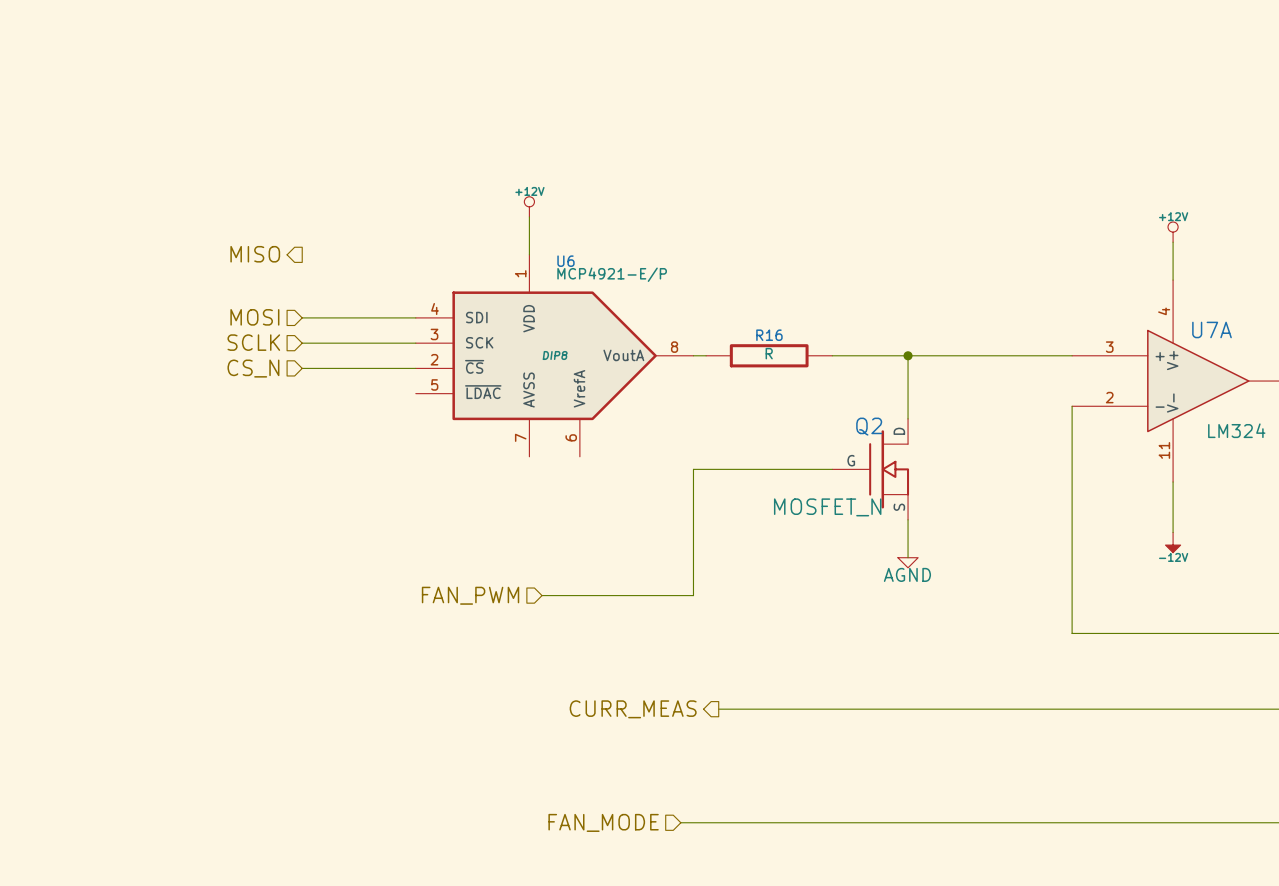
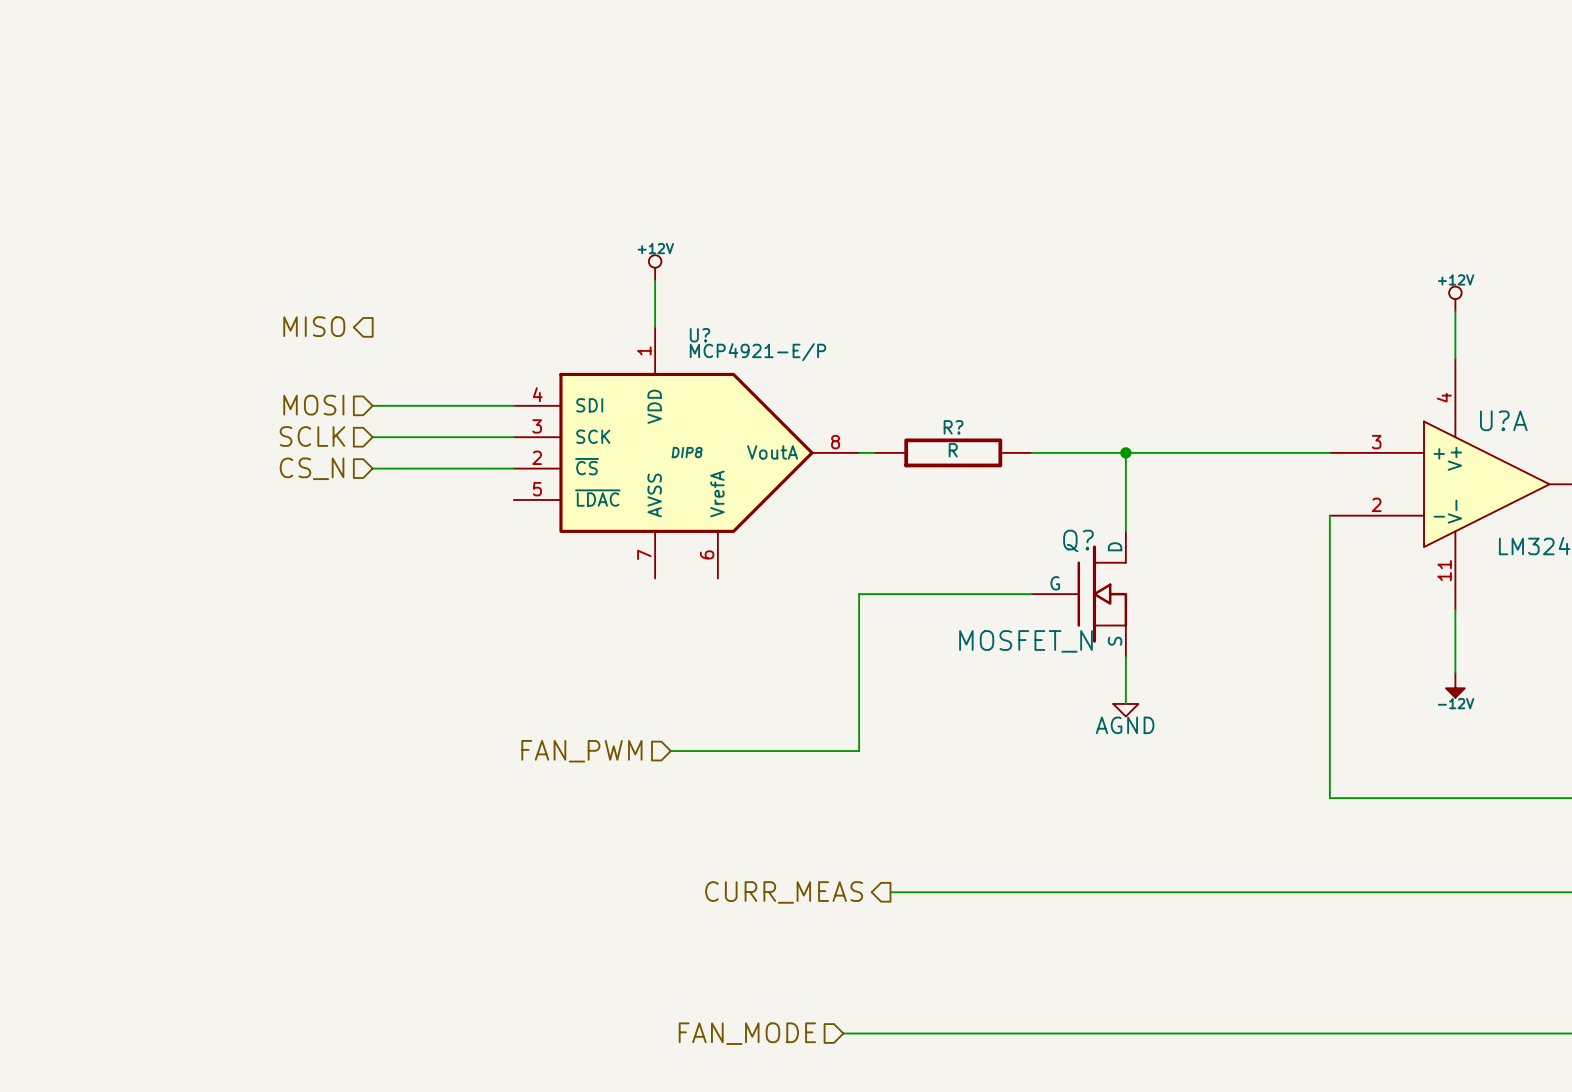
U6 name: U6 (565, 261) -> U? (700, 335)
U7A name: U7A (1212, 329) -> U?A (1503, 420)
R16 name: R16 (769, 335) -> R? (953, 427)
Q2 name: Q2 (869, 426) -> Q? (1078, 540)

